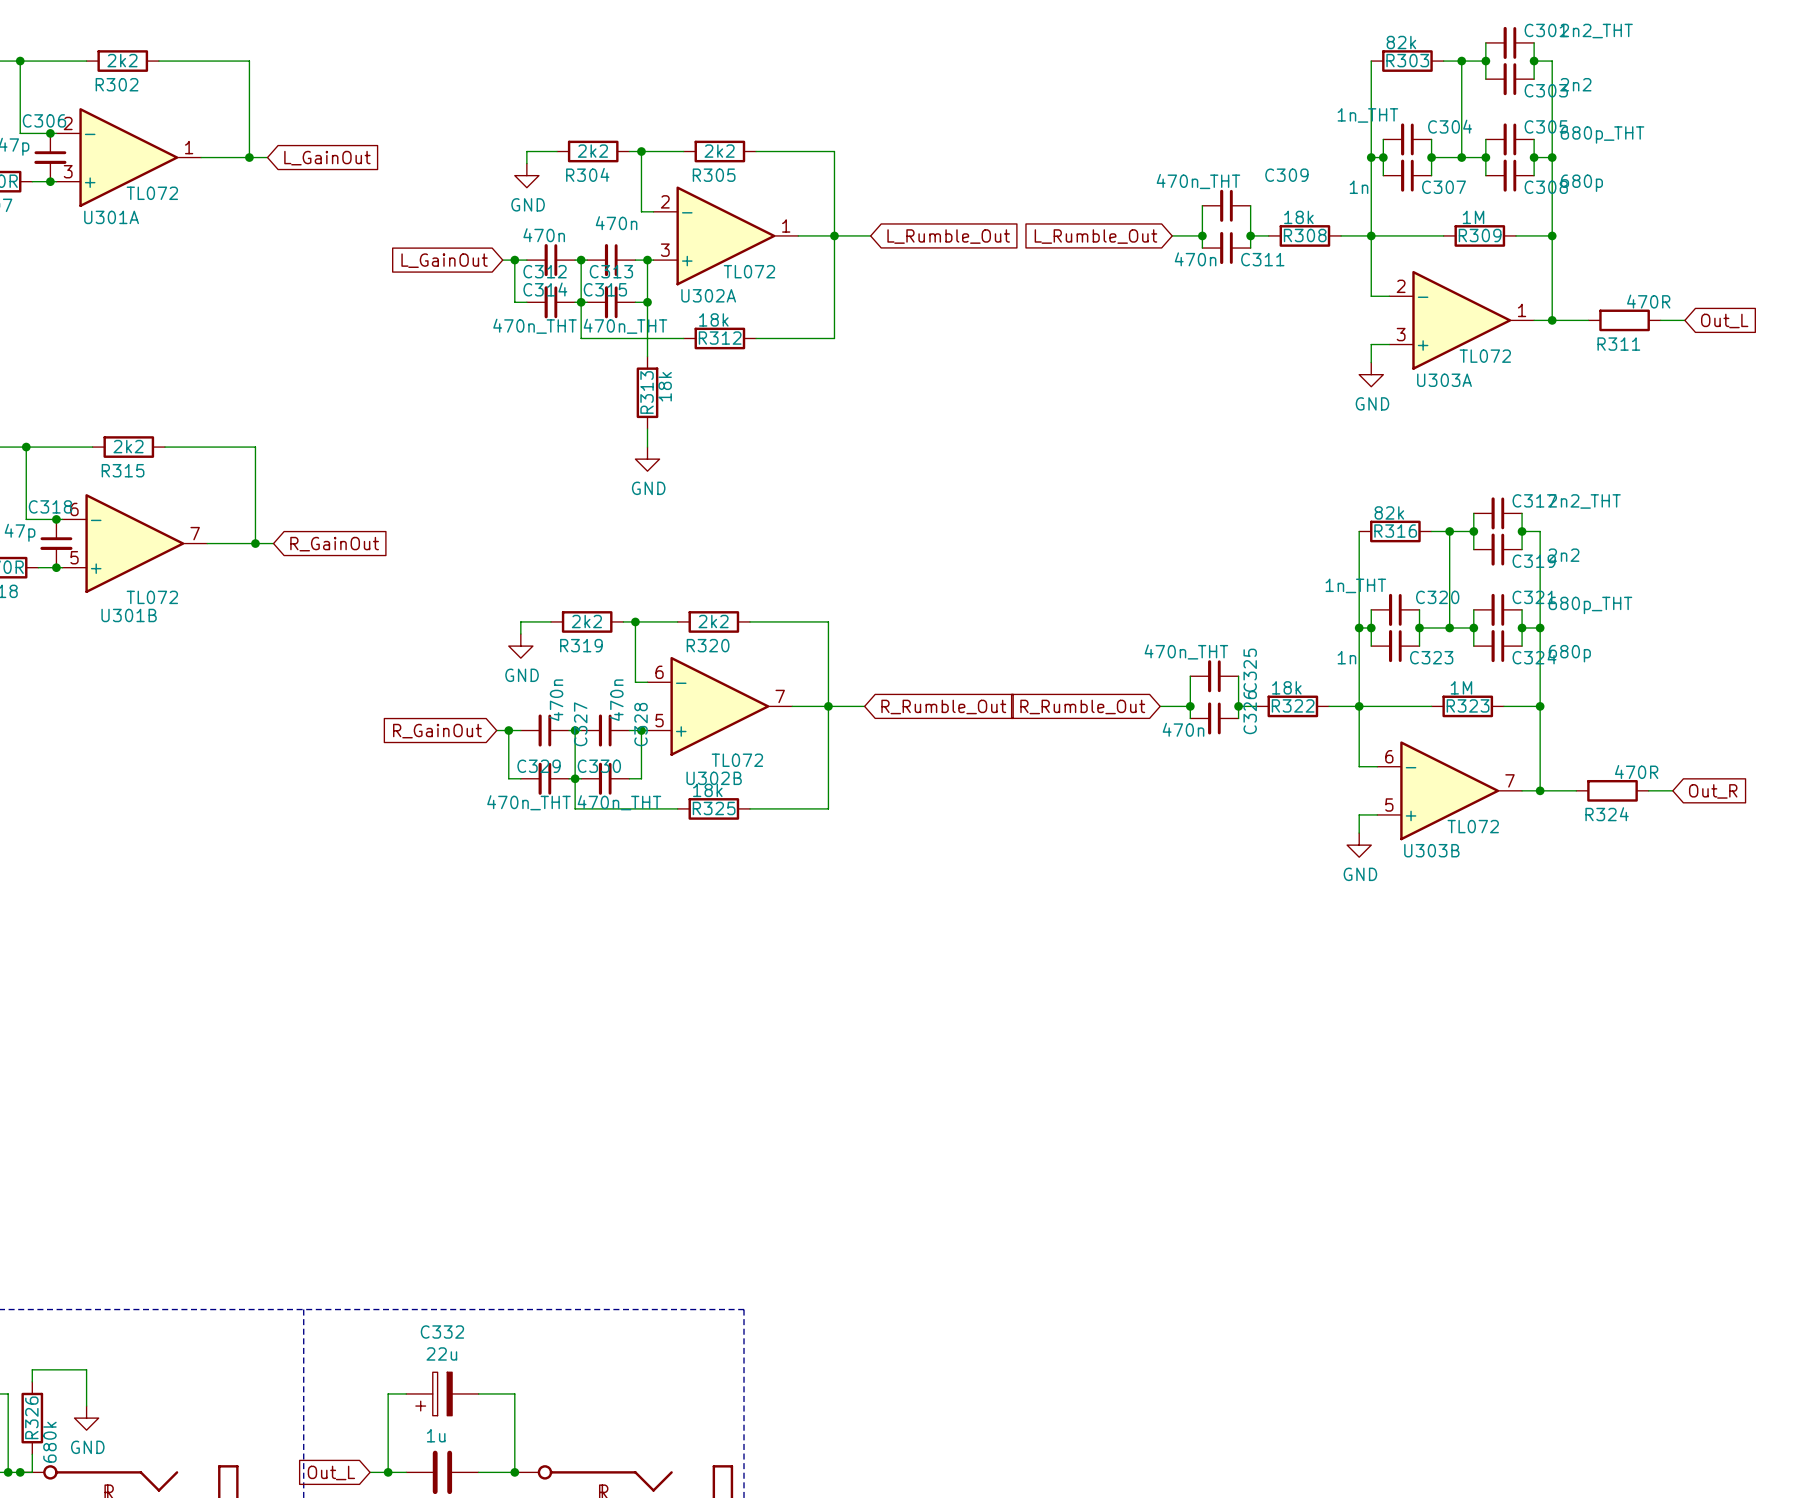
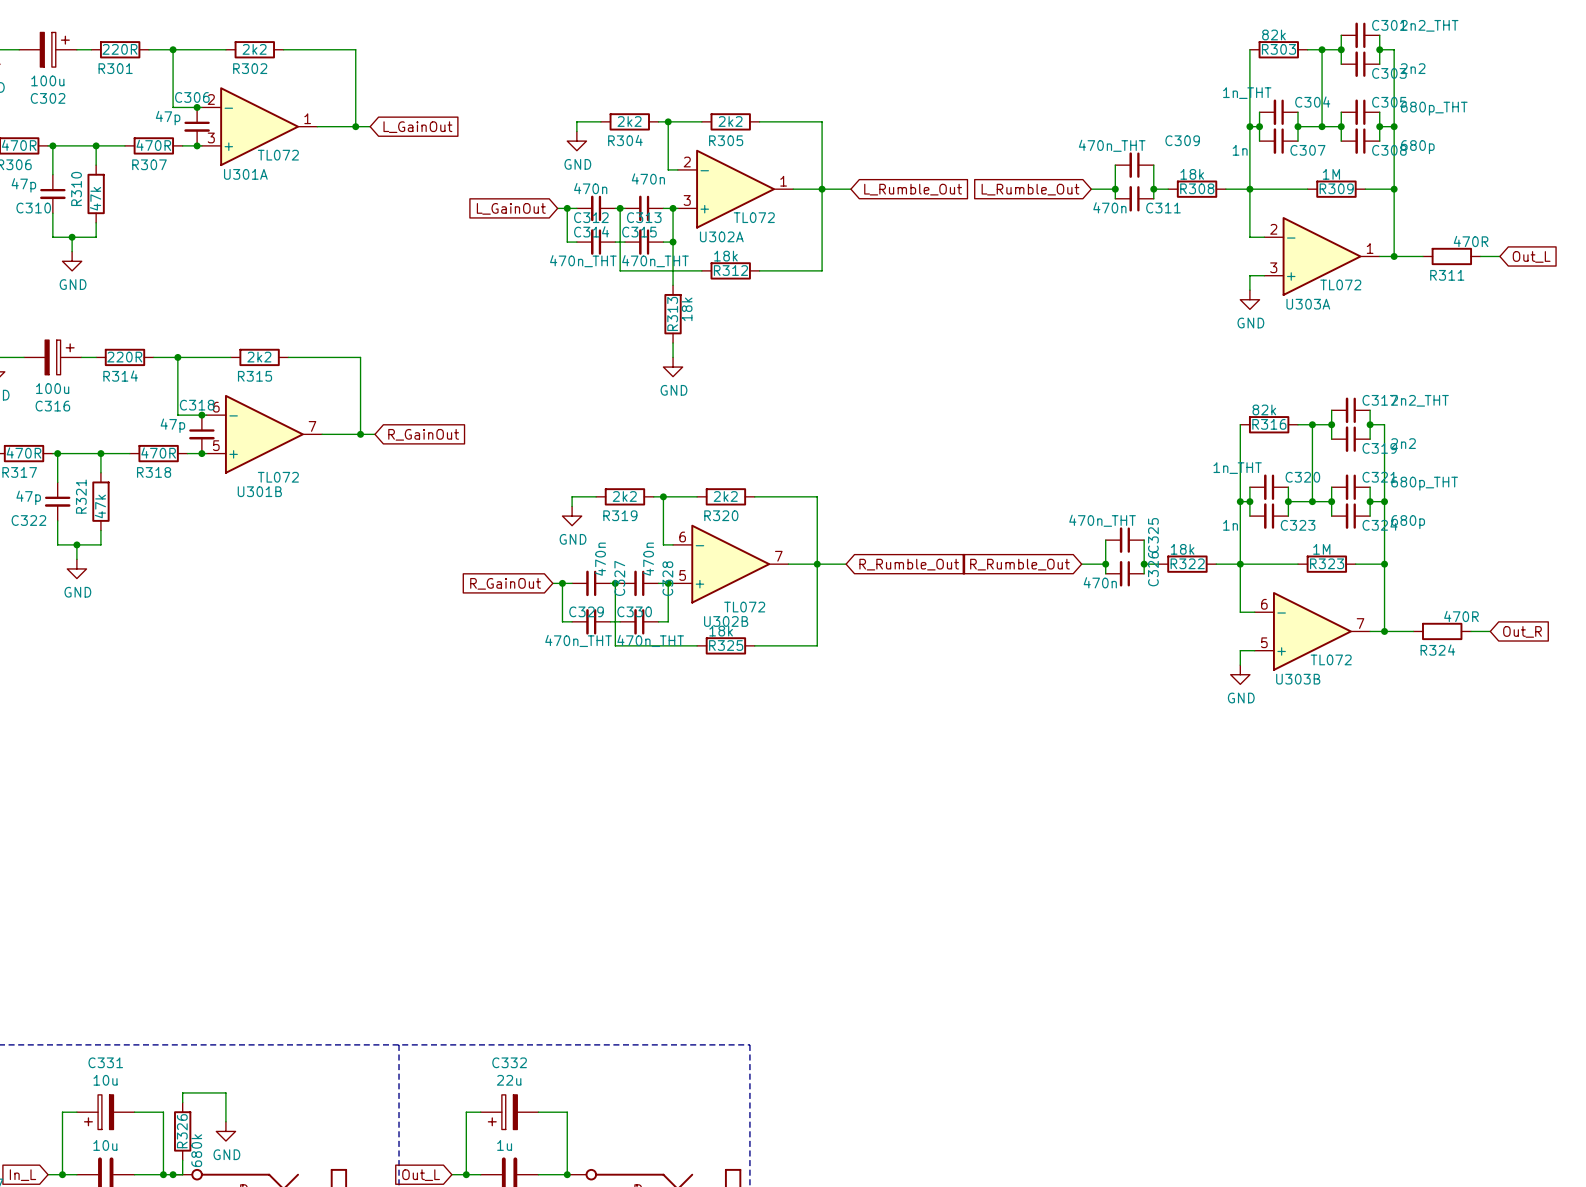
junction: (581, 302) -> none
junction: (575, 778) -> none

